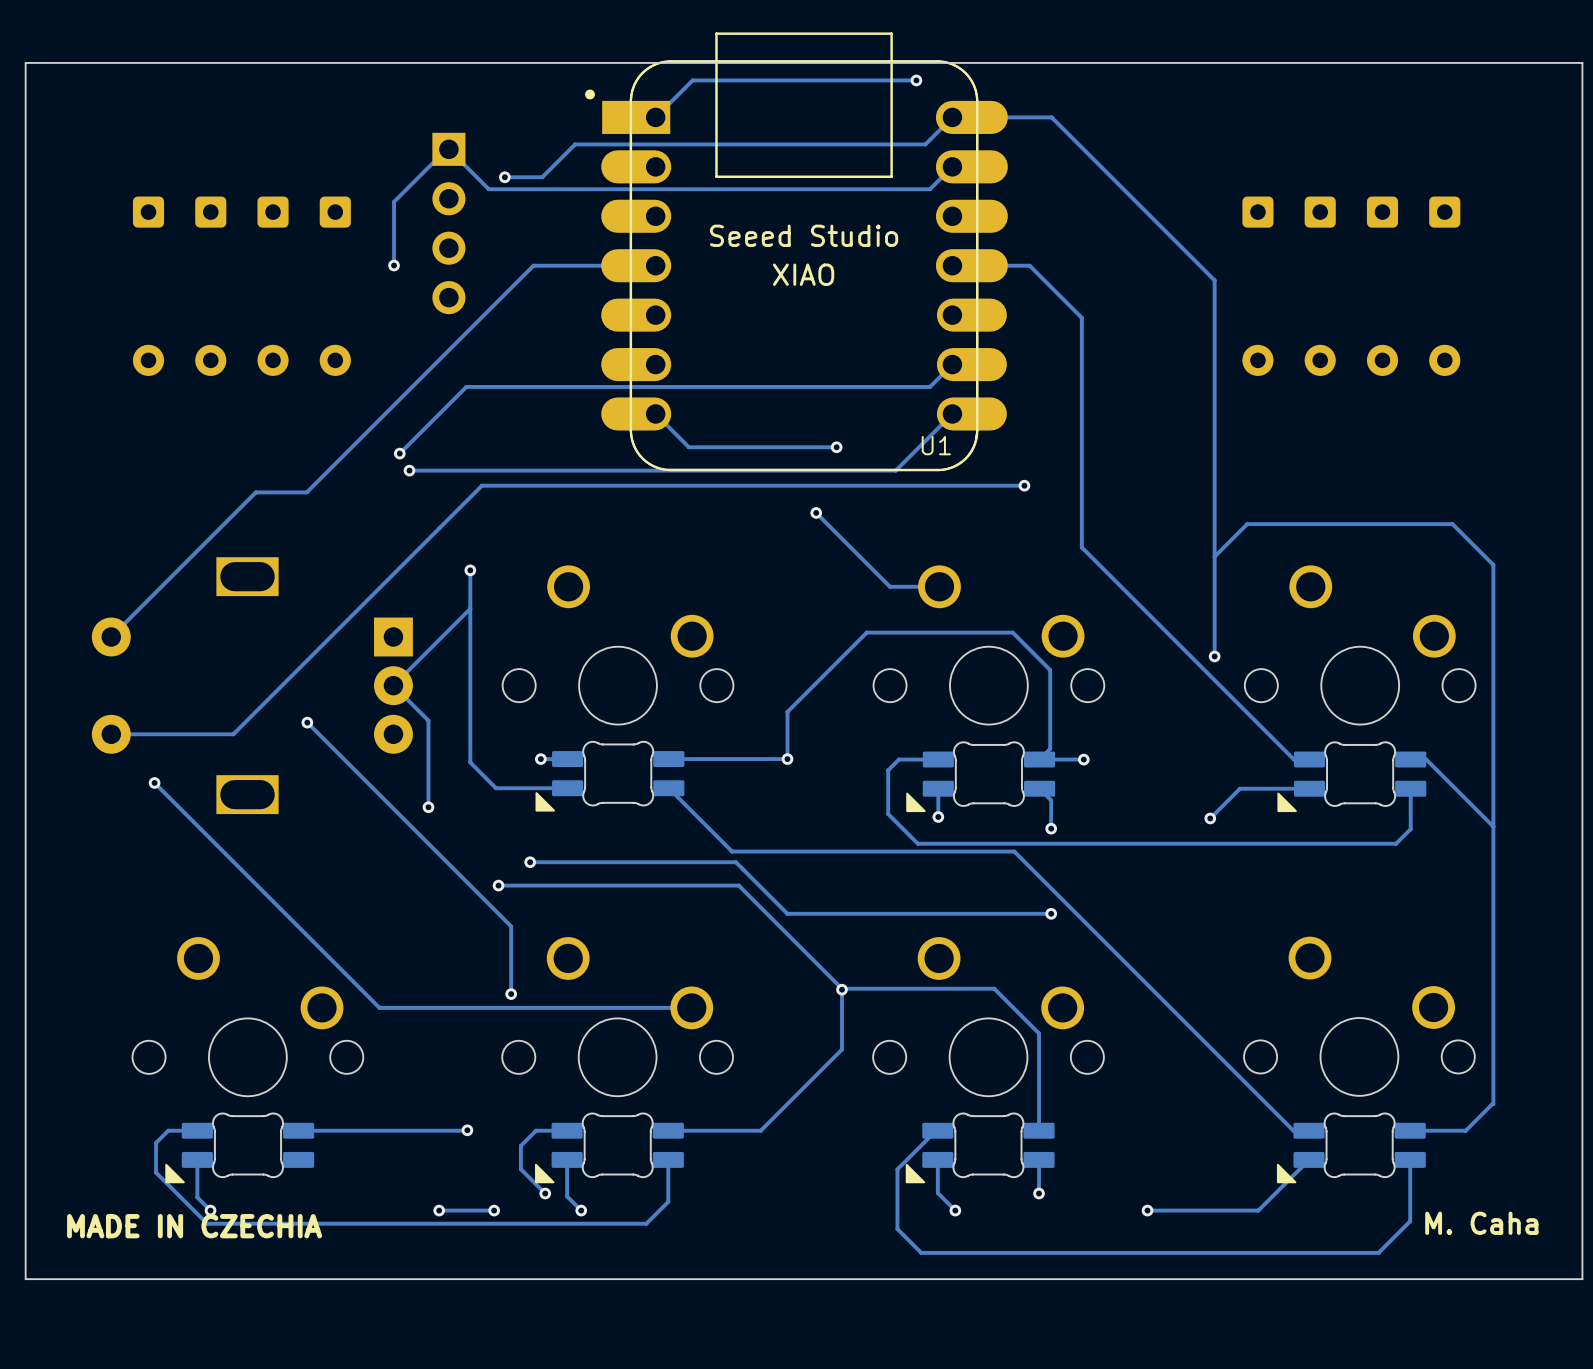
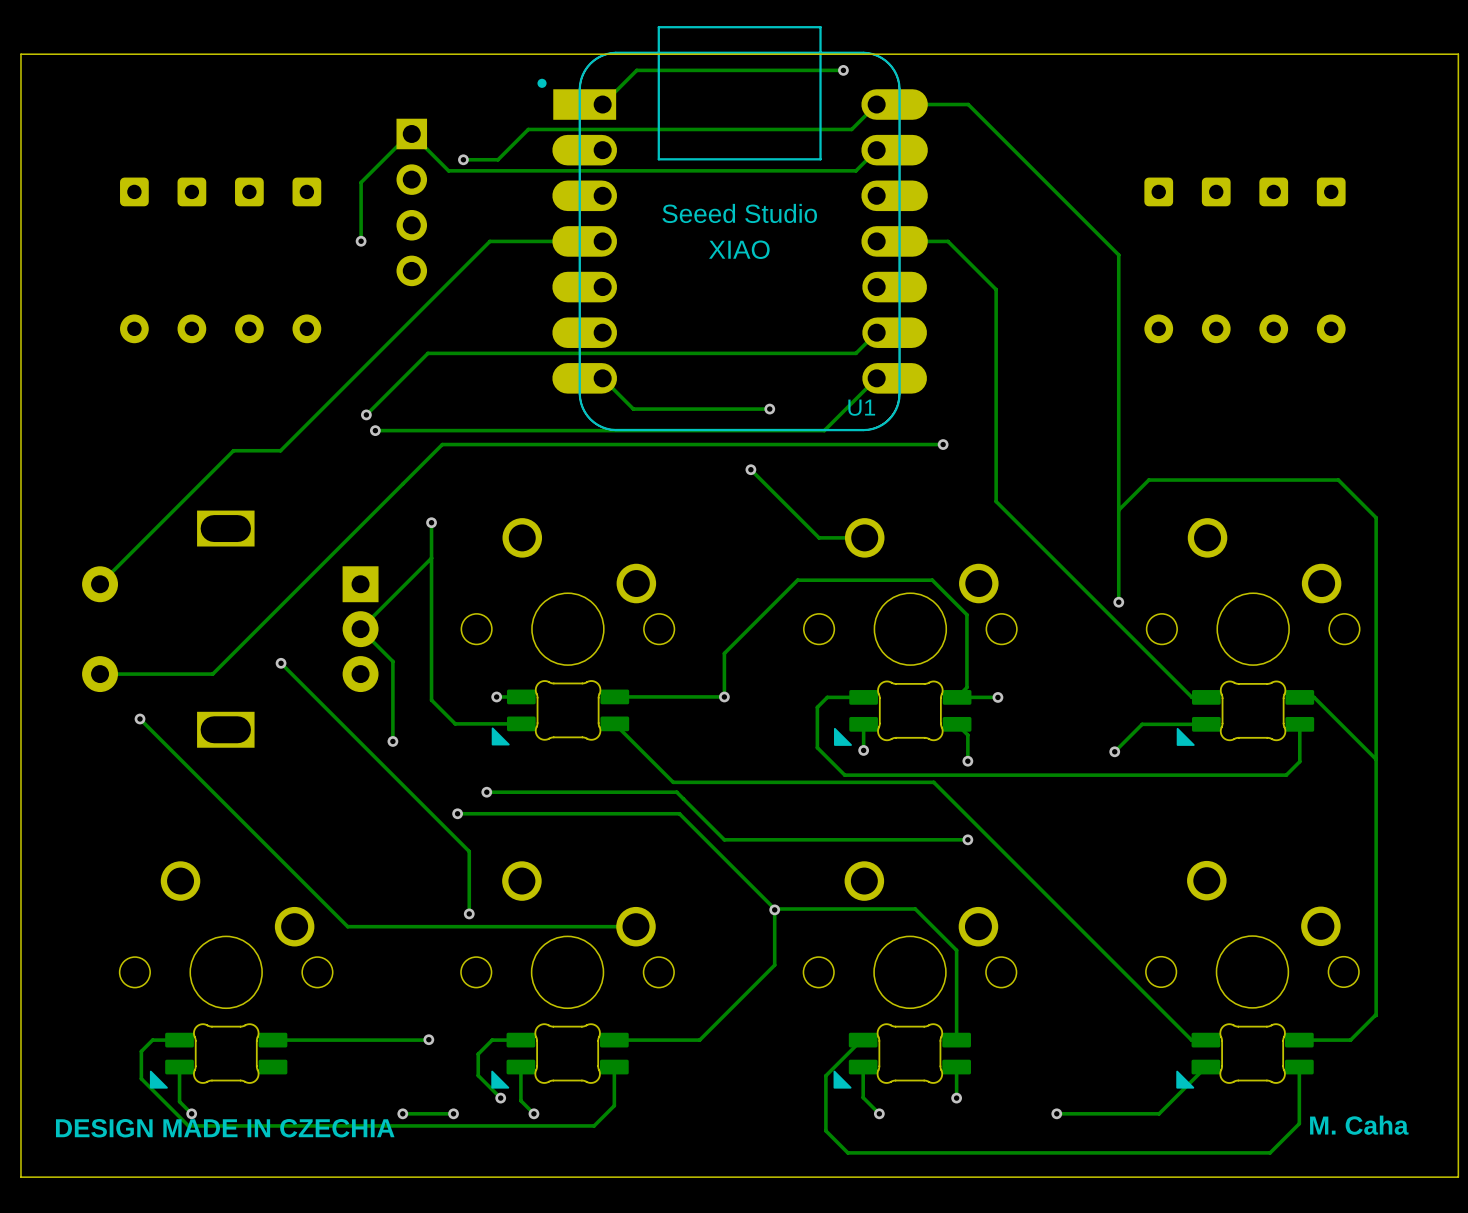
text: MADE IN CZECHIA (194, 1226) -> DESIGN MADE IN CZECHIA (225, 1128)

